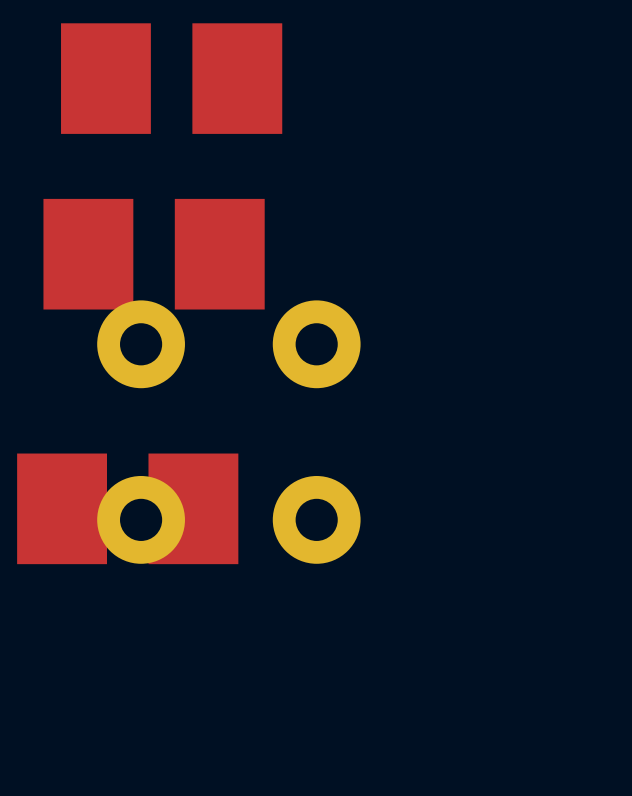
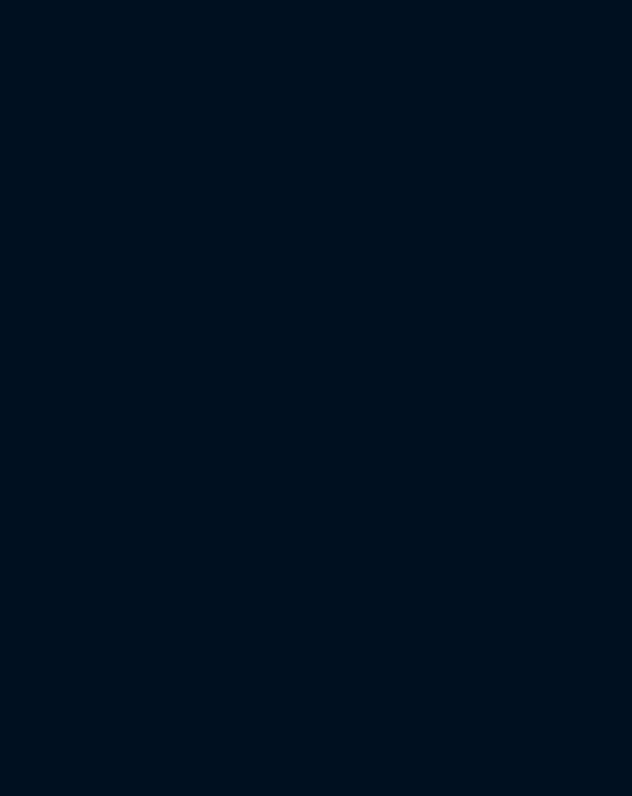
part: (171, 78) -> none
part: (154, 254) -> none
part: (228, 432) -> none
part: (127, 508) -> none

